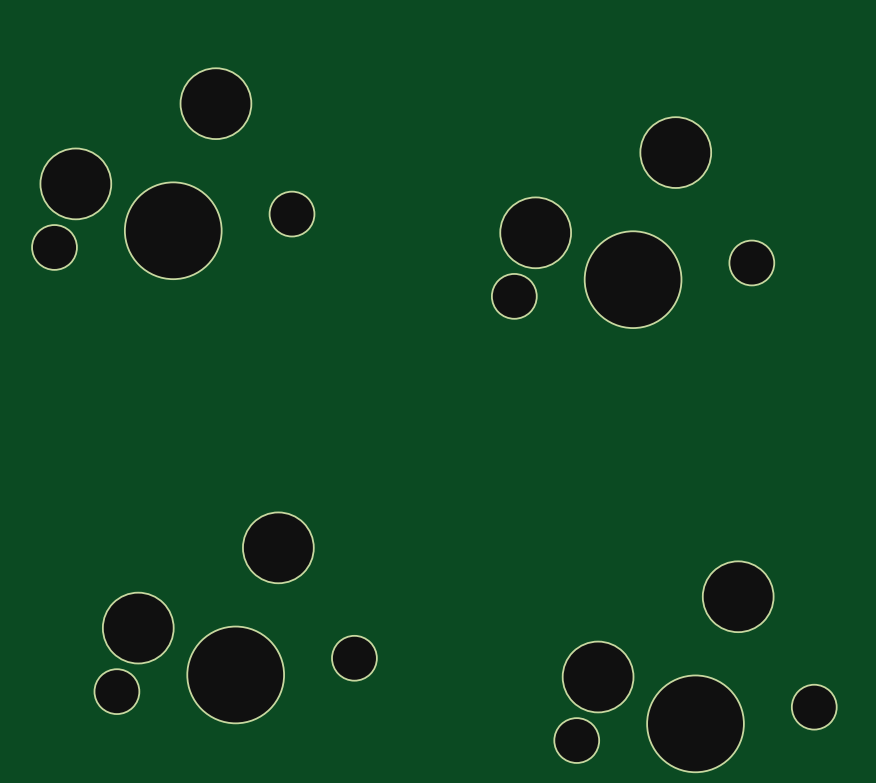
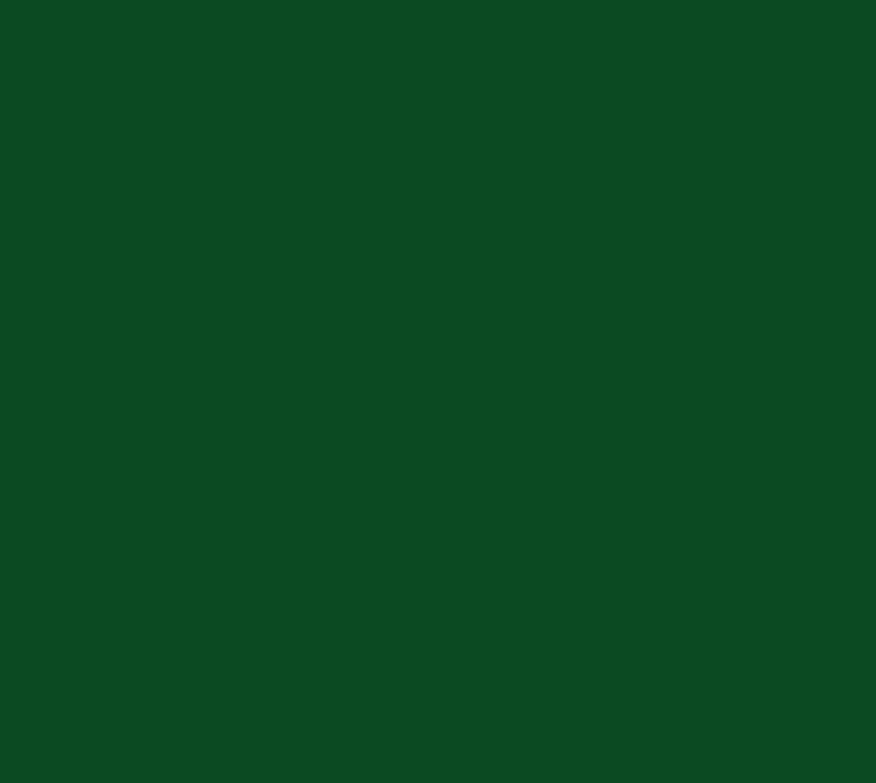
part: (173, 173) -> none
part: (633, 222) -> none
part: (235, 617) -> none
part: (695, 666) -> none

